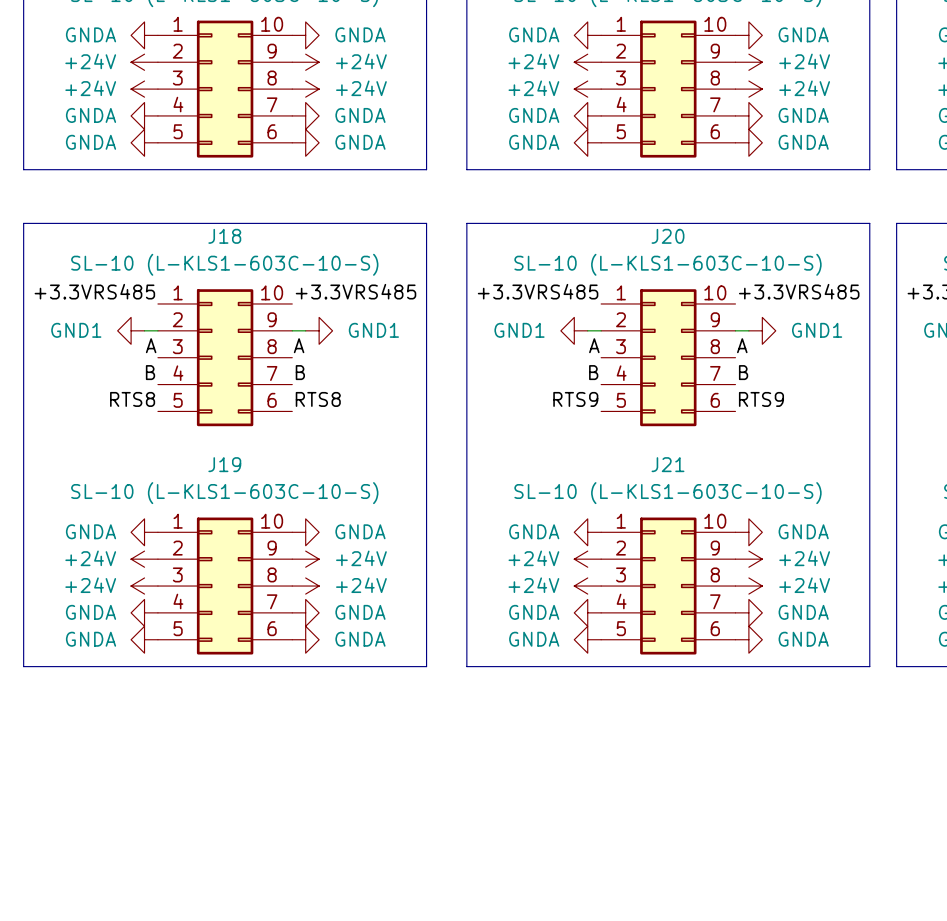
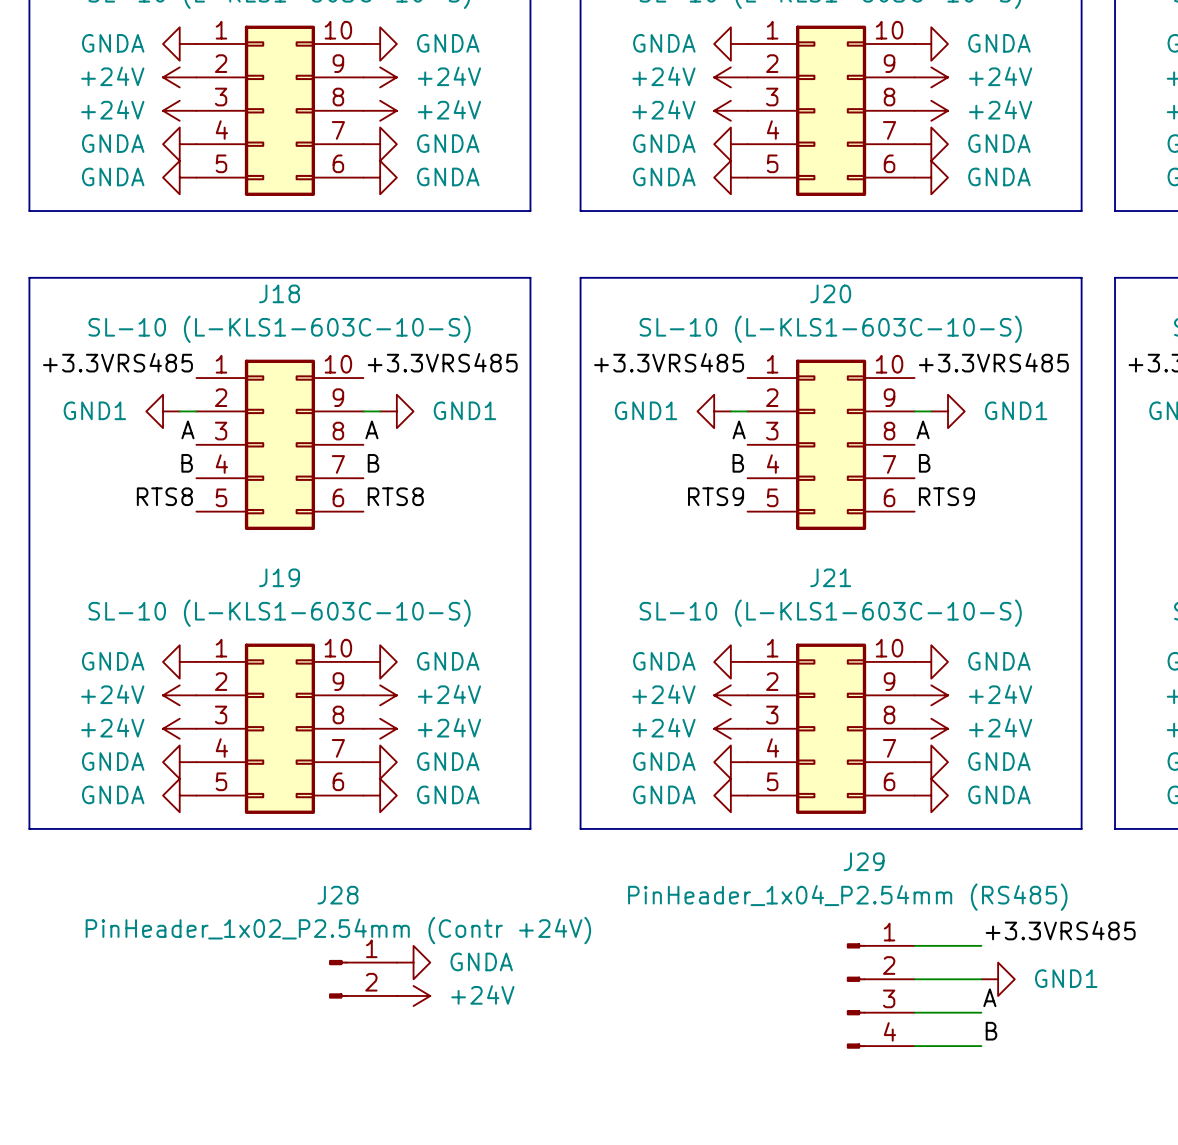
label: none -> +3.3VRS485 (1060, 930)
wire: none -> (914, 945) (981, 945)
power symbol: none -> GNDA (413, 962)
J28: none -> PinHeader_1x02_P2.54mm (Contr +24V) (362, 979)
wire: none -> (914, 979) (981, 979)
power symbol: none -> GND1 (998, 979)
power symbol: none -> +24V (413, 995)
J29: none -> PinHeader_1x04_P2.54mm (RS485) (880, 995)
label: none -> A (989, 997)
wire: none -> (914, 1012) (981, 1012)
label: none -> B (991, 1031)
wire: none -> (914, 1046) (981, 1046)

